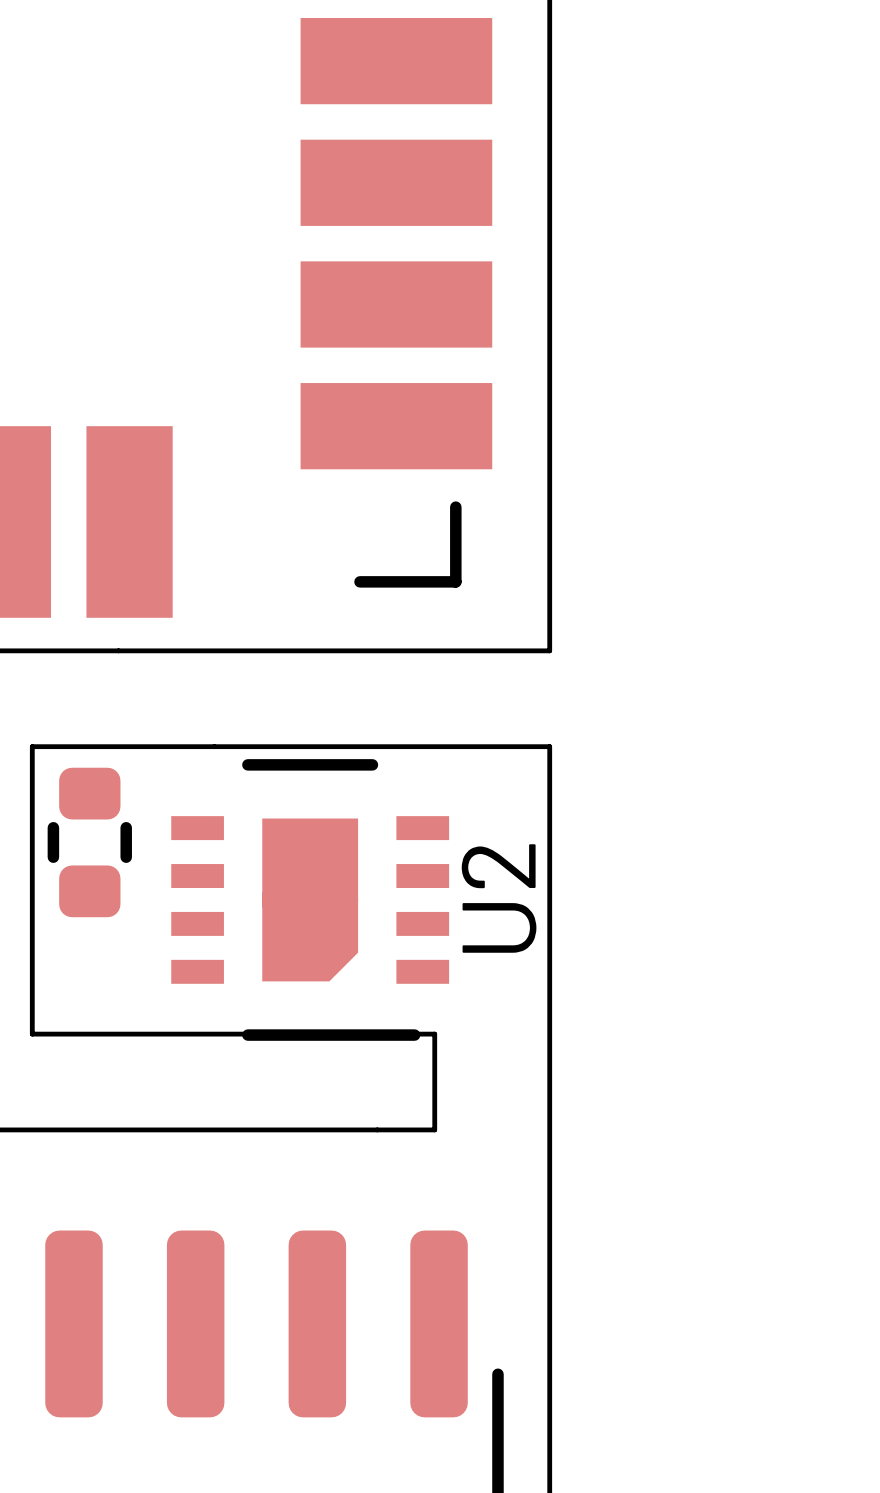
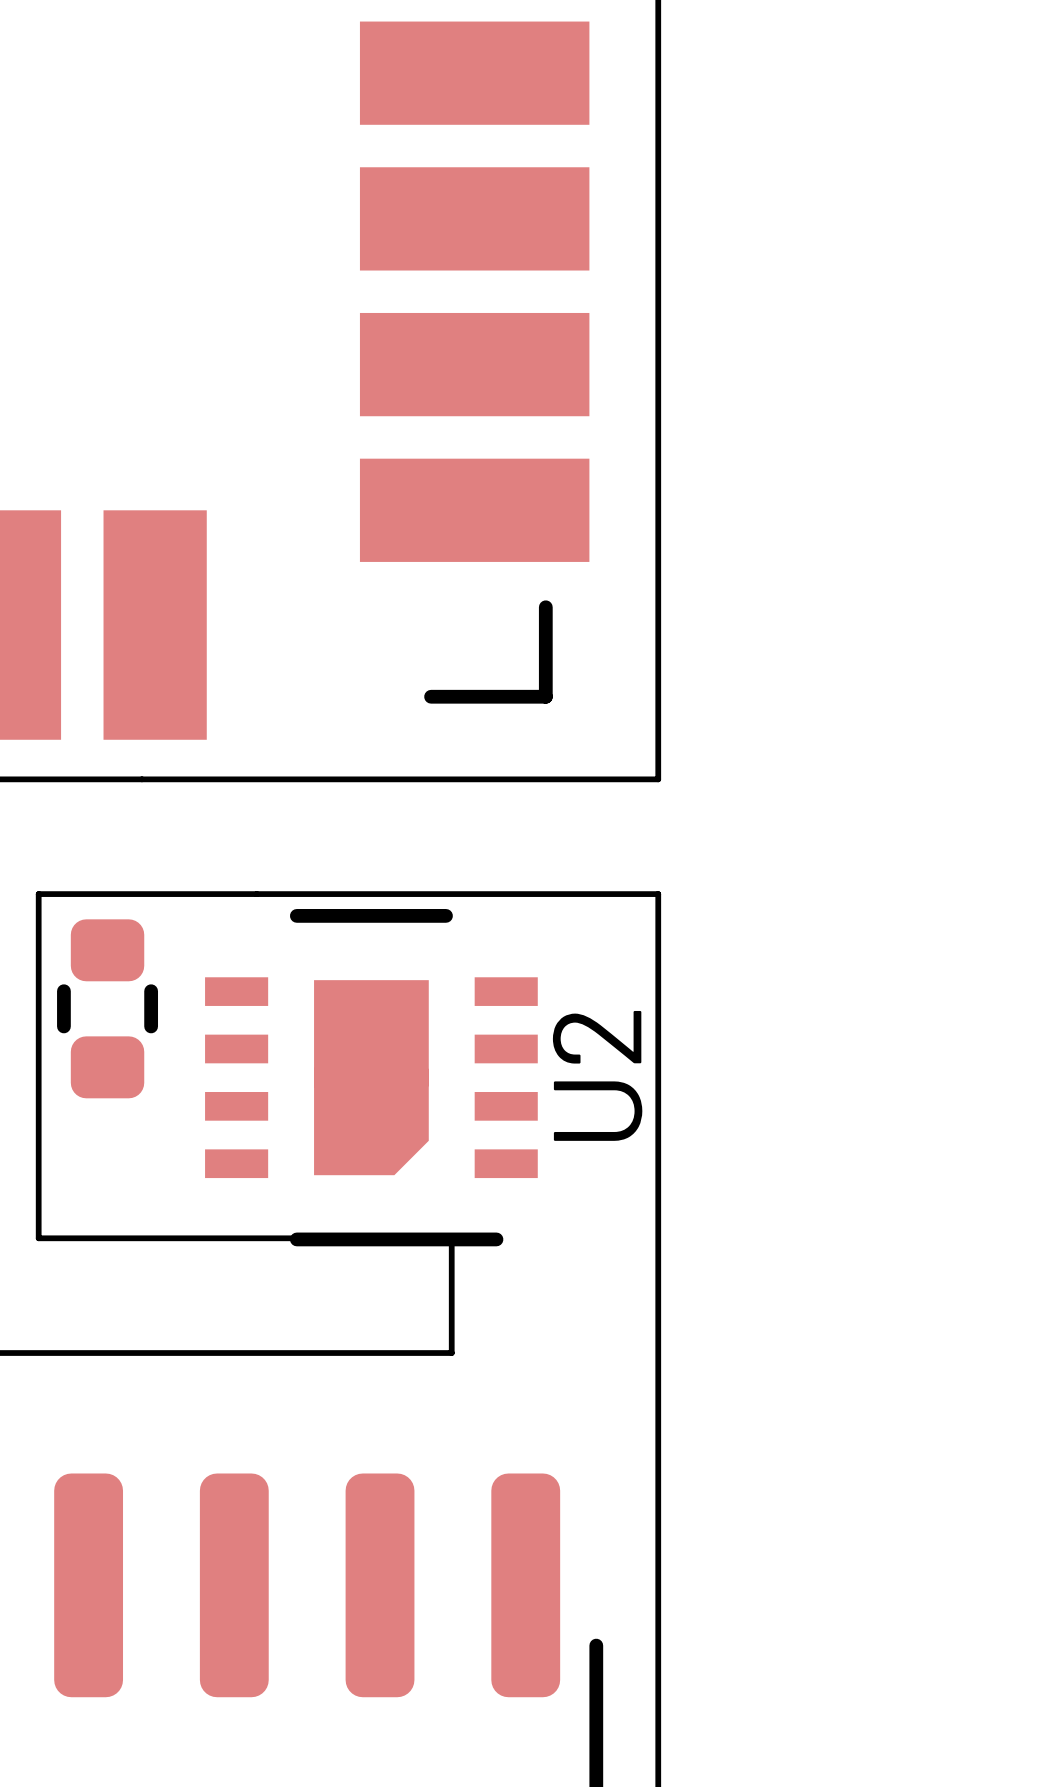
board edge: (377, 1034) (434, 1034) (434, 1129) (377, 1129) -> (451, 1238) (451, 1353)

